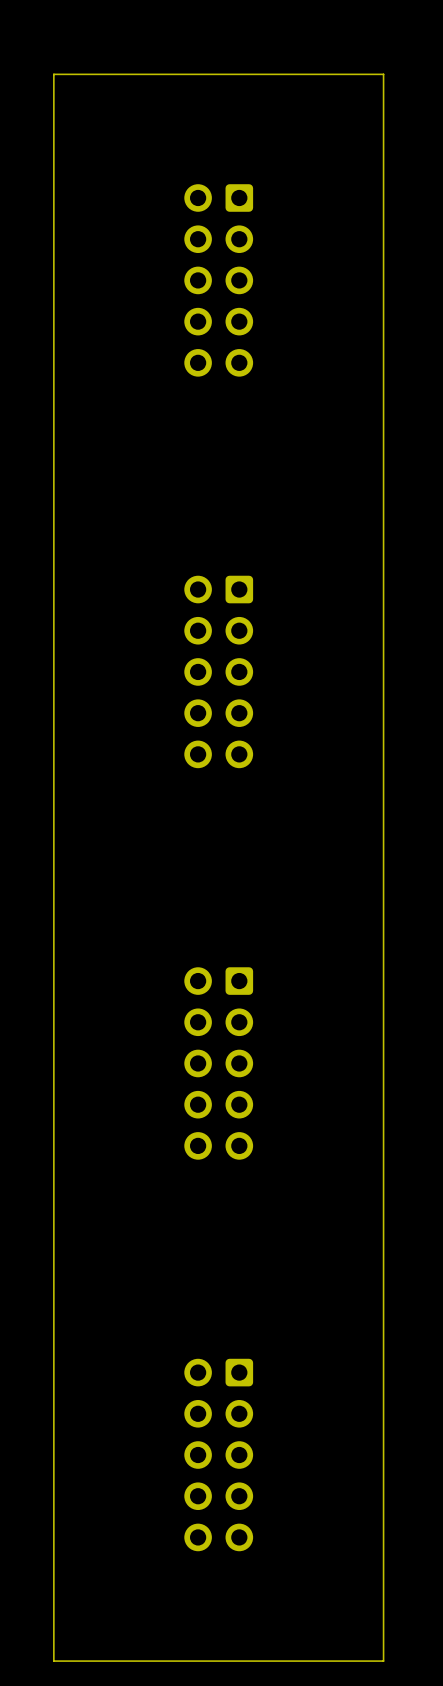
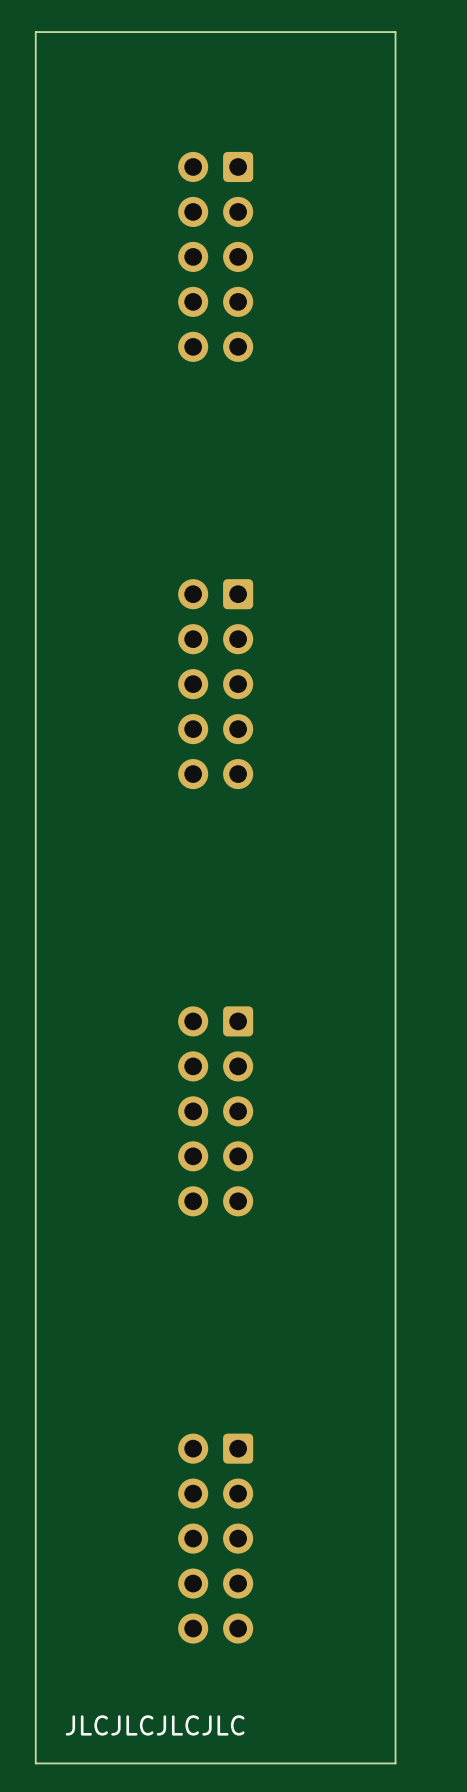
text: none -> JLCJLCJLCJLC (155, 1725)

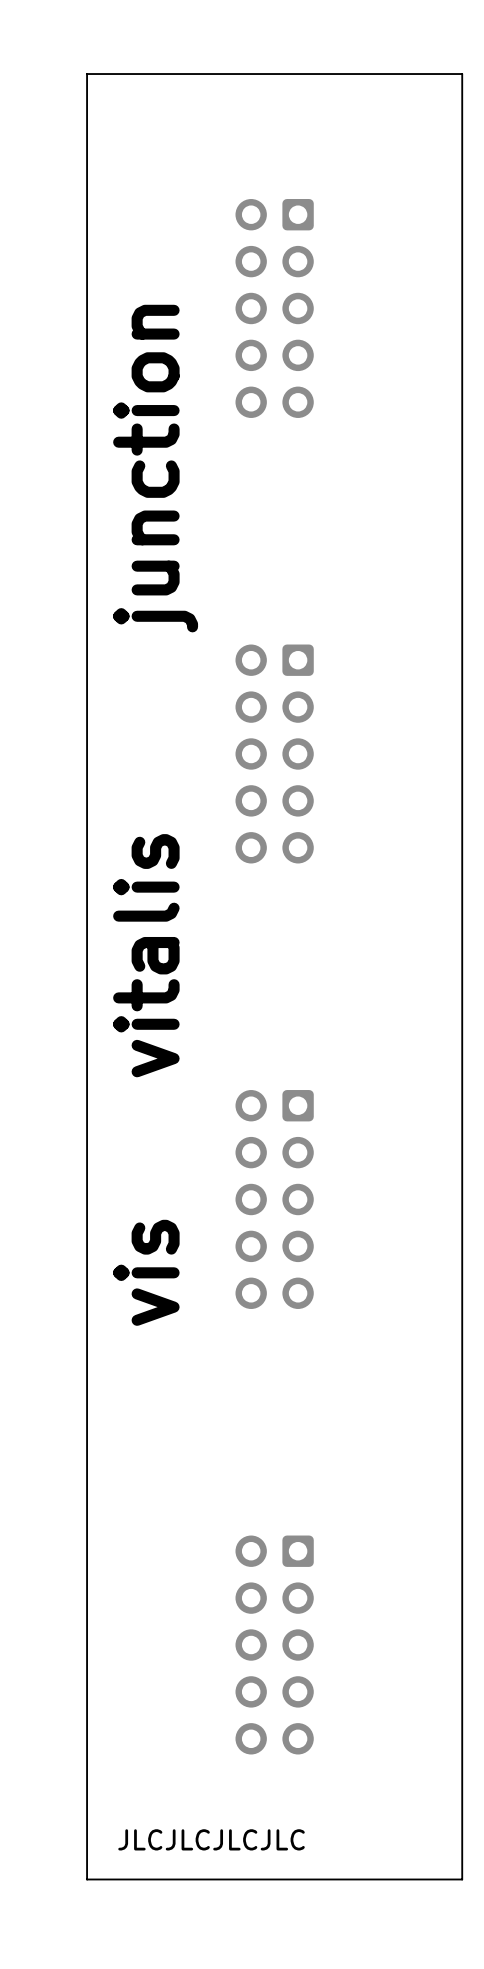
text: none -> junction (155, 468)
text: none -> vitalis (146, 955)
text: none -> vis (146, 1272)

